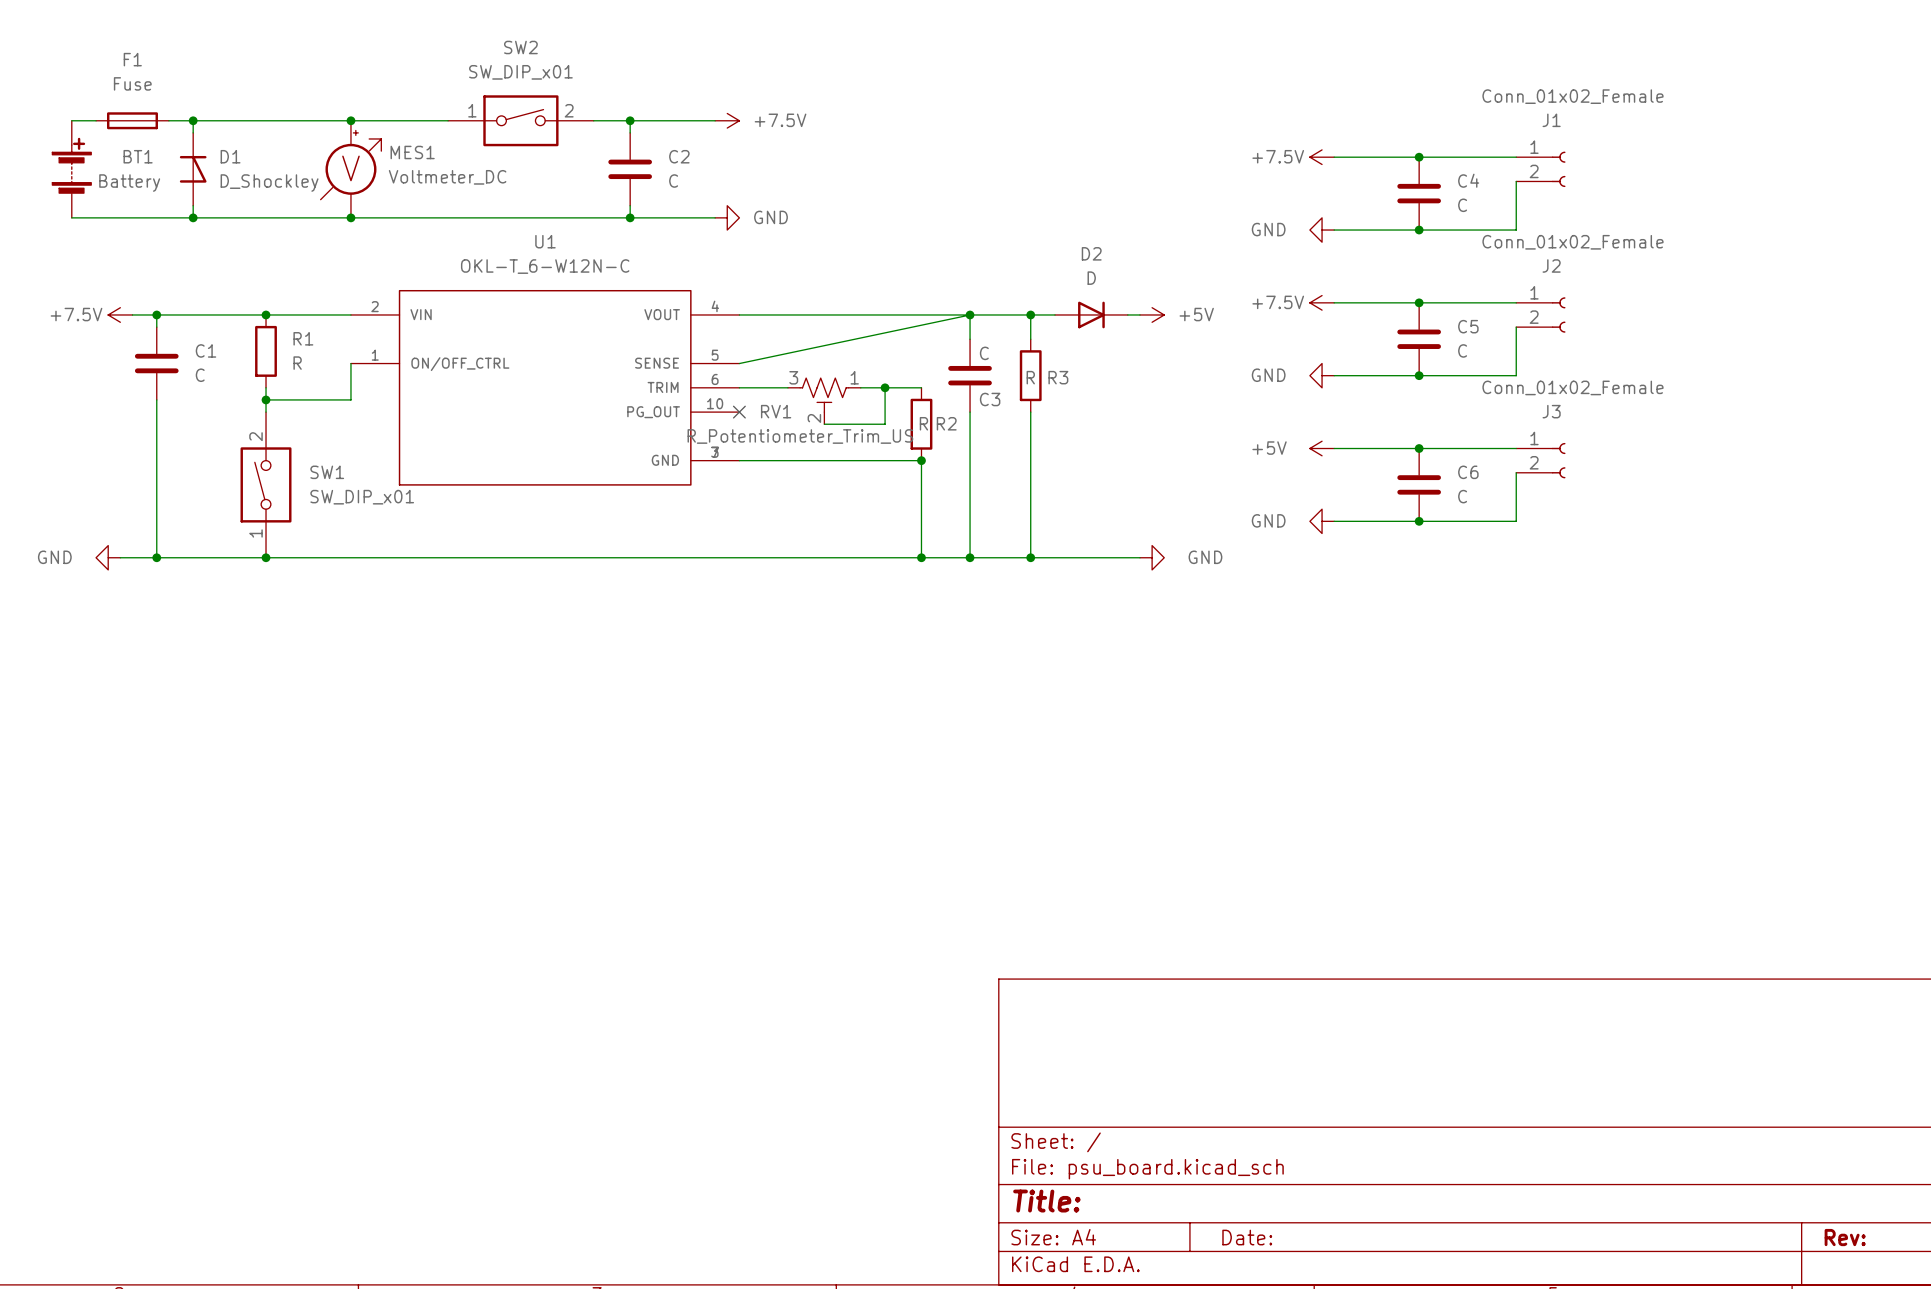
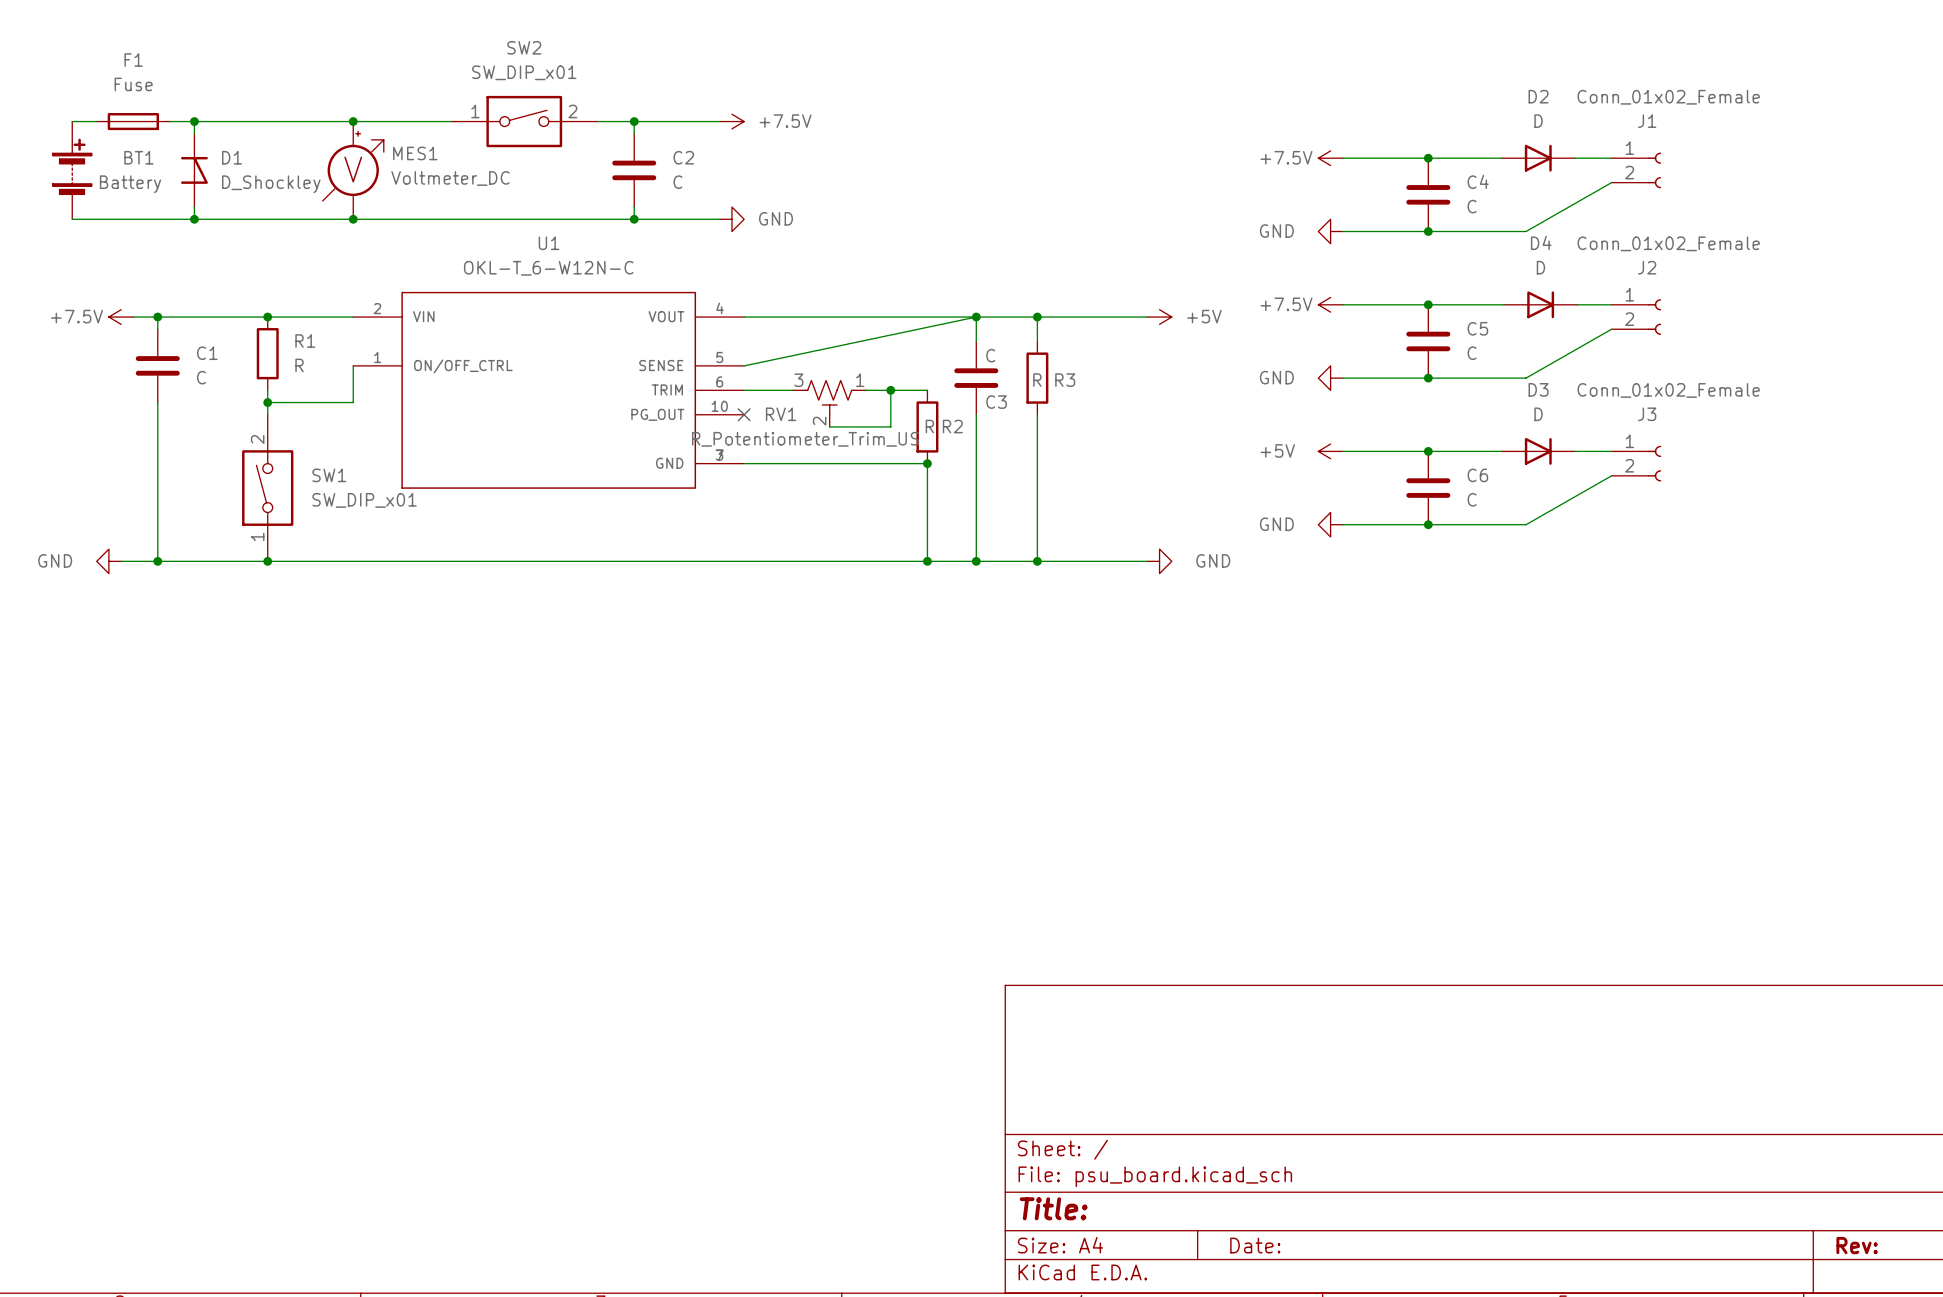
wire: none -> (1574, 158) (1611, 158)
J1 position: (1540, 169) -> (1636, 170)
wire: (1516, 181) (1516, 230) -> (1611, 182) (1526, 231)
D4: none -> D (1540, 304)
wire: none -> (1577, 304) (1611, 304)
D2 position: (1091, 314) -> (1538, 158)
J2 position: (1540, 314) -> (1636, 317)
wire: (1516, 327) (1516, 375) -> (1611, 329) (1526, 378)
D3: none -> D (1538, 451)
wire: none -> (1574, 451) (1611, 451)
J3 position: (1540, 460) -> (1636, 463)
wire: (1516, 472) (1516, 521) -> (1611, 475) (1526, 524)

